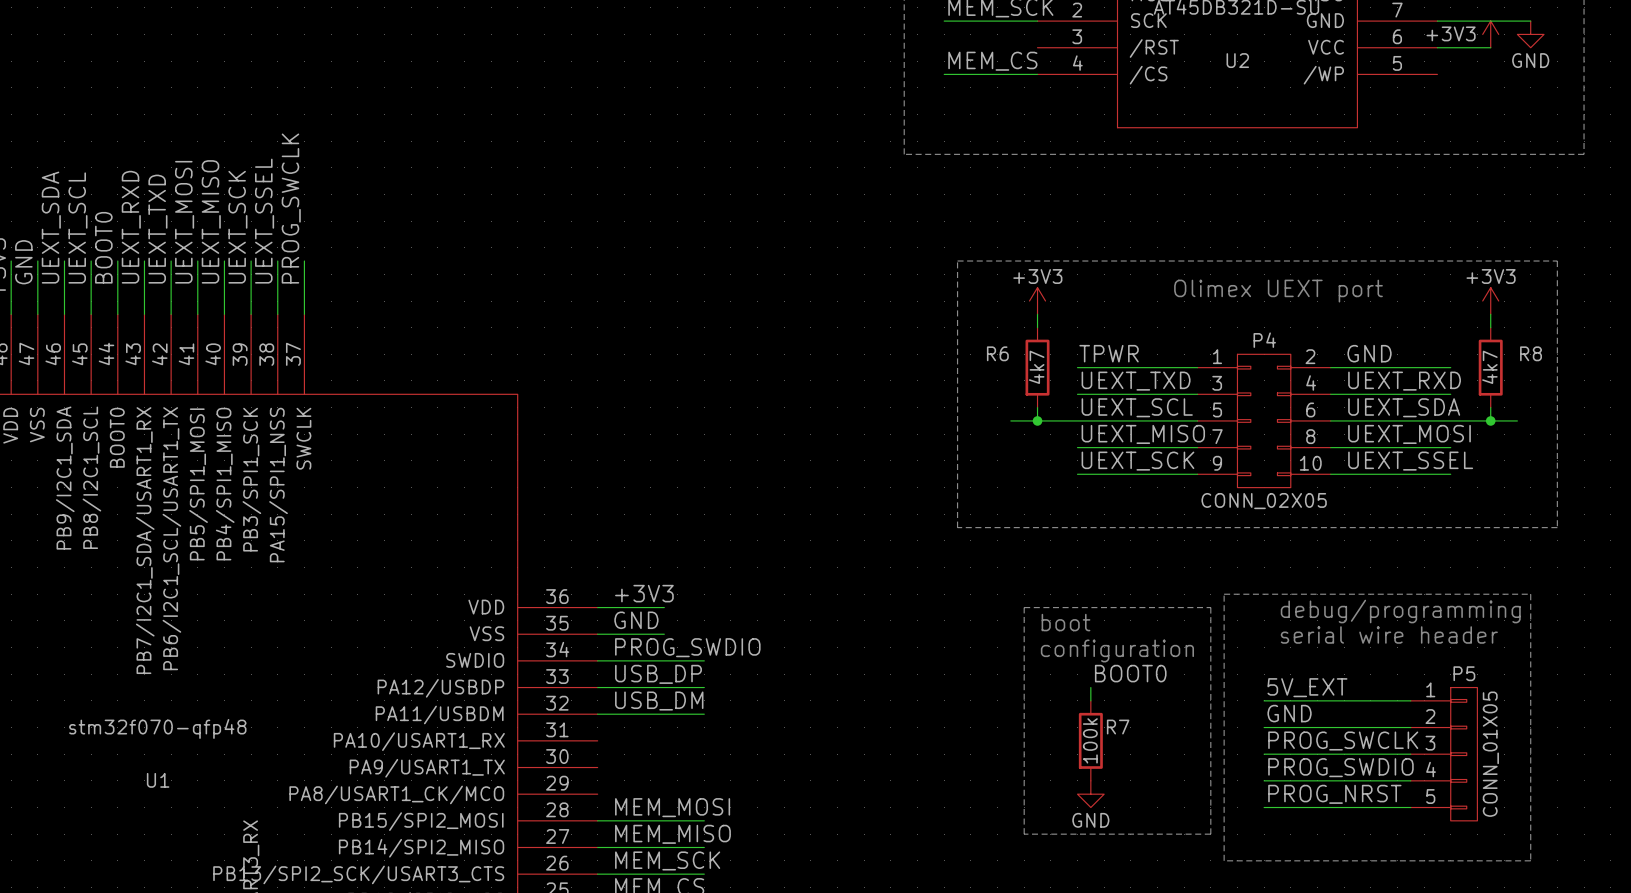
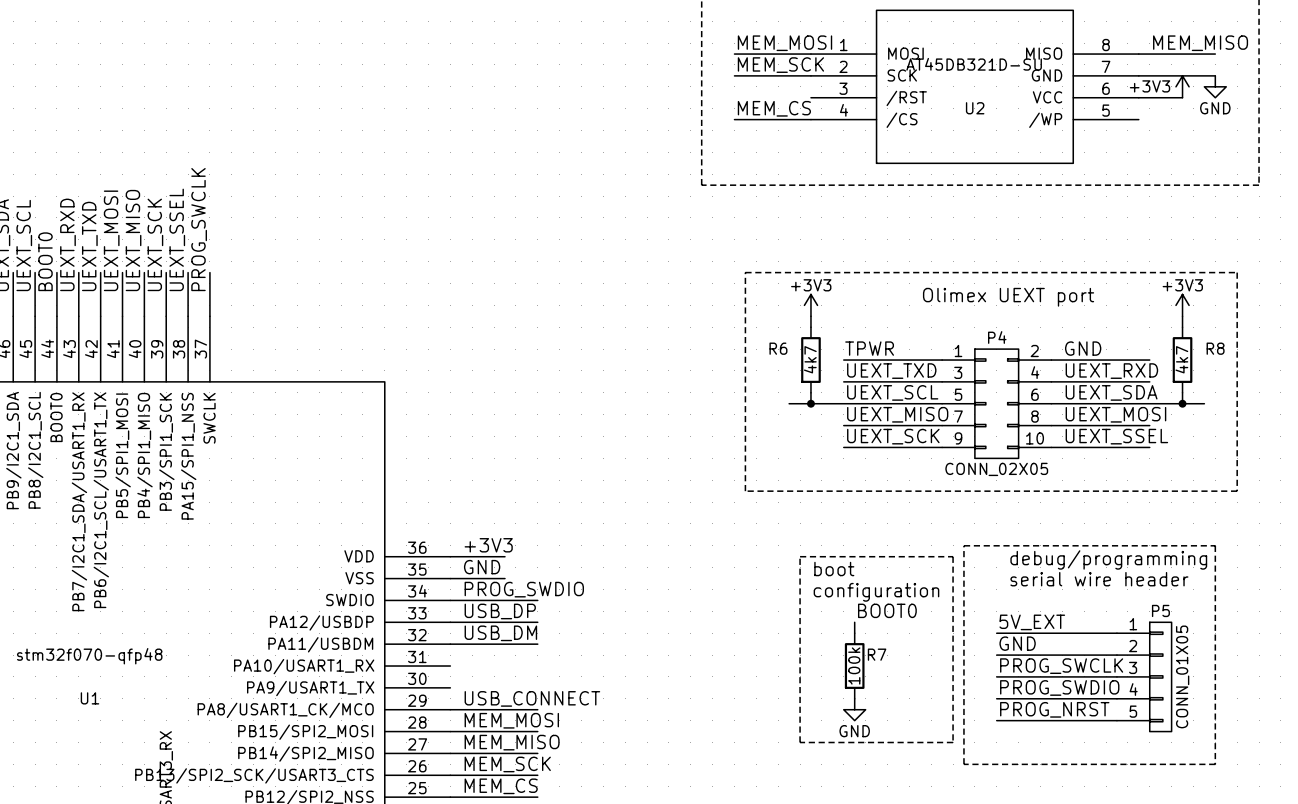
label: none -> USB_CONNECT (532, 698)
wire: none -> (450, 709) (537, 709)

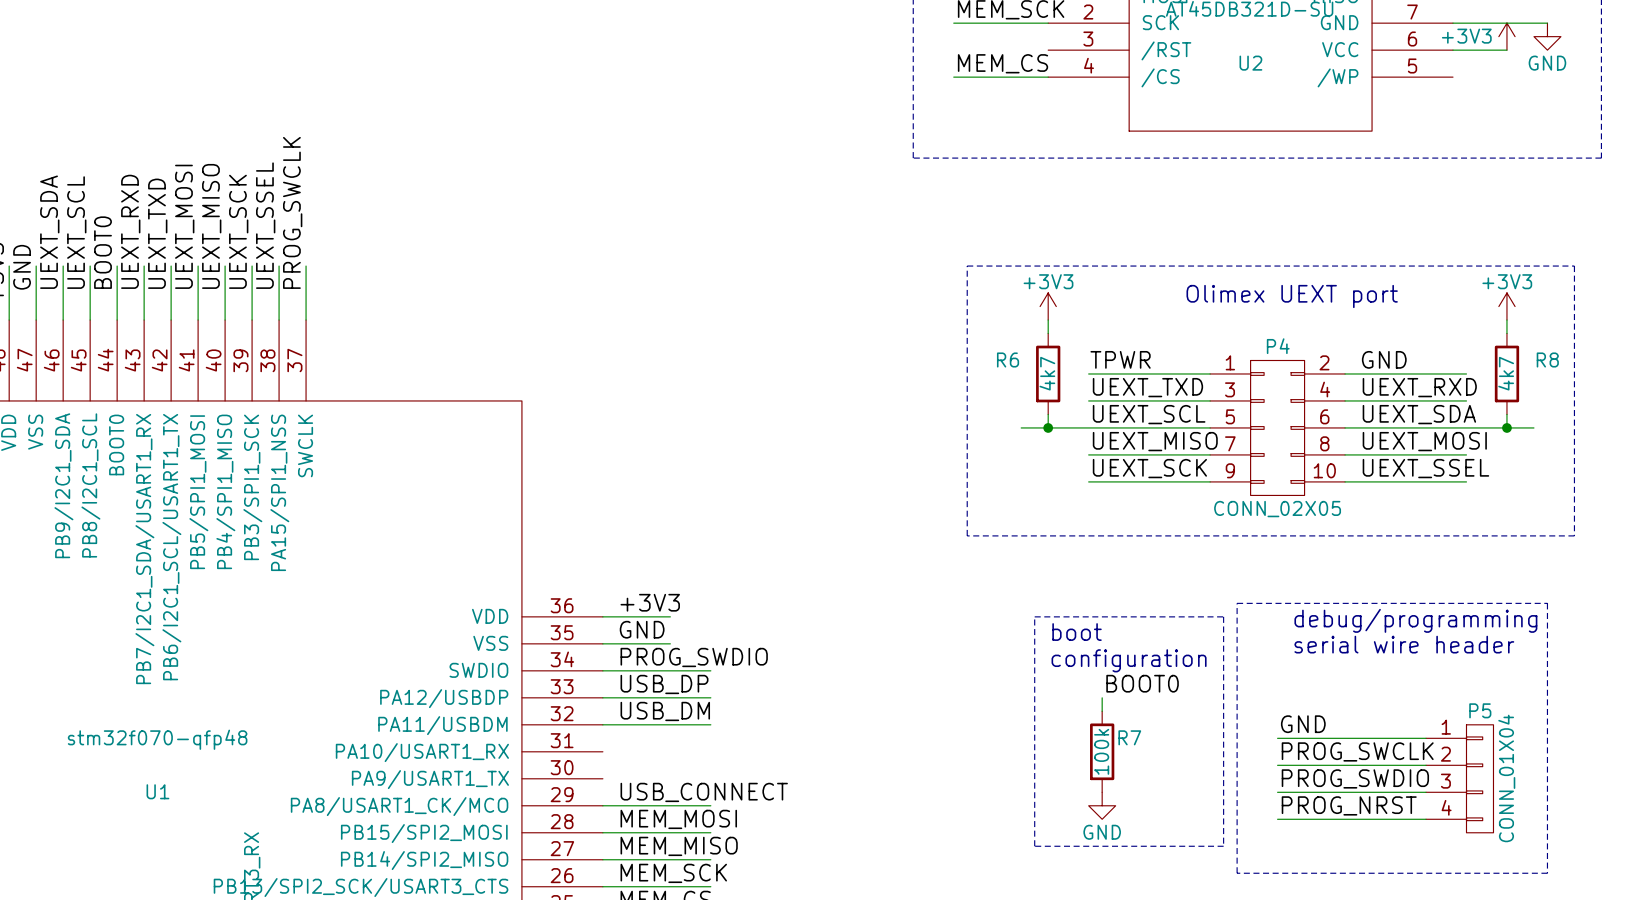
label: 5V_EXT (1032, 622) -> none
P5 symbol: [1116, 622, 1172, 732] -> [1426, 724, 1494, 833]
wire: (996, 633) (1116, 633) -> none
P5 value: CONN_01X05 (1182, 676) -> CONN_01X04 (1506, 778)

